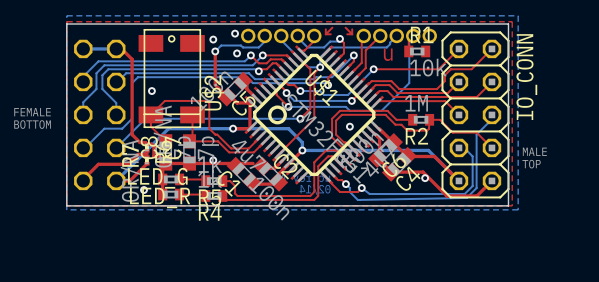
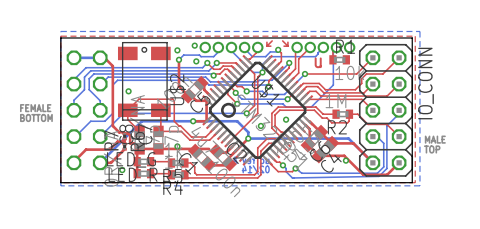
via: none -> (260, 125)

